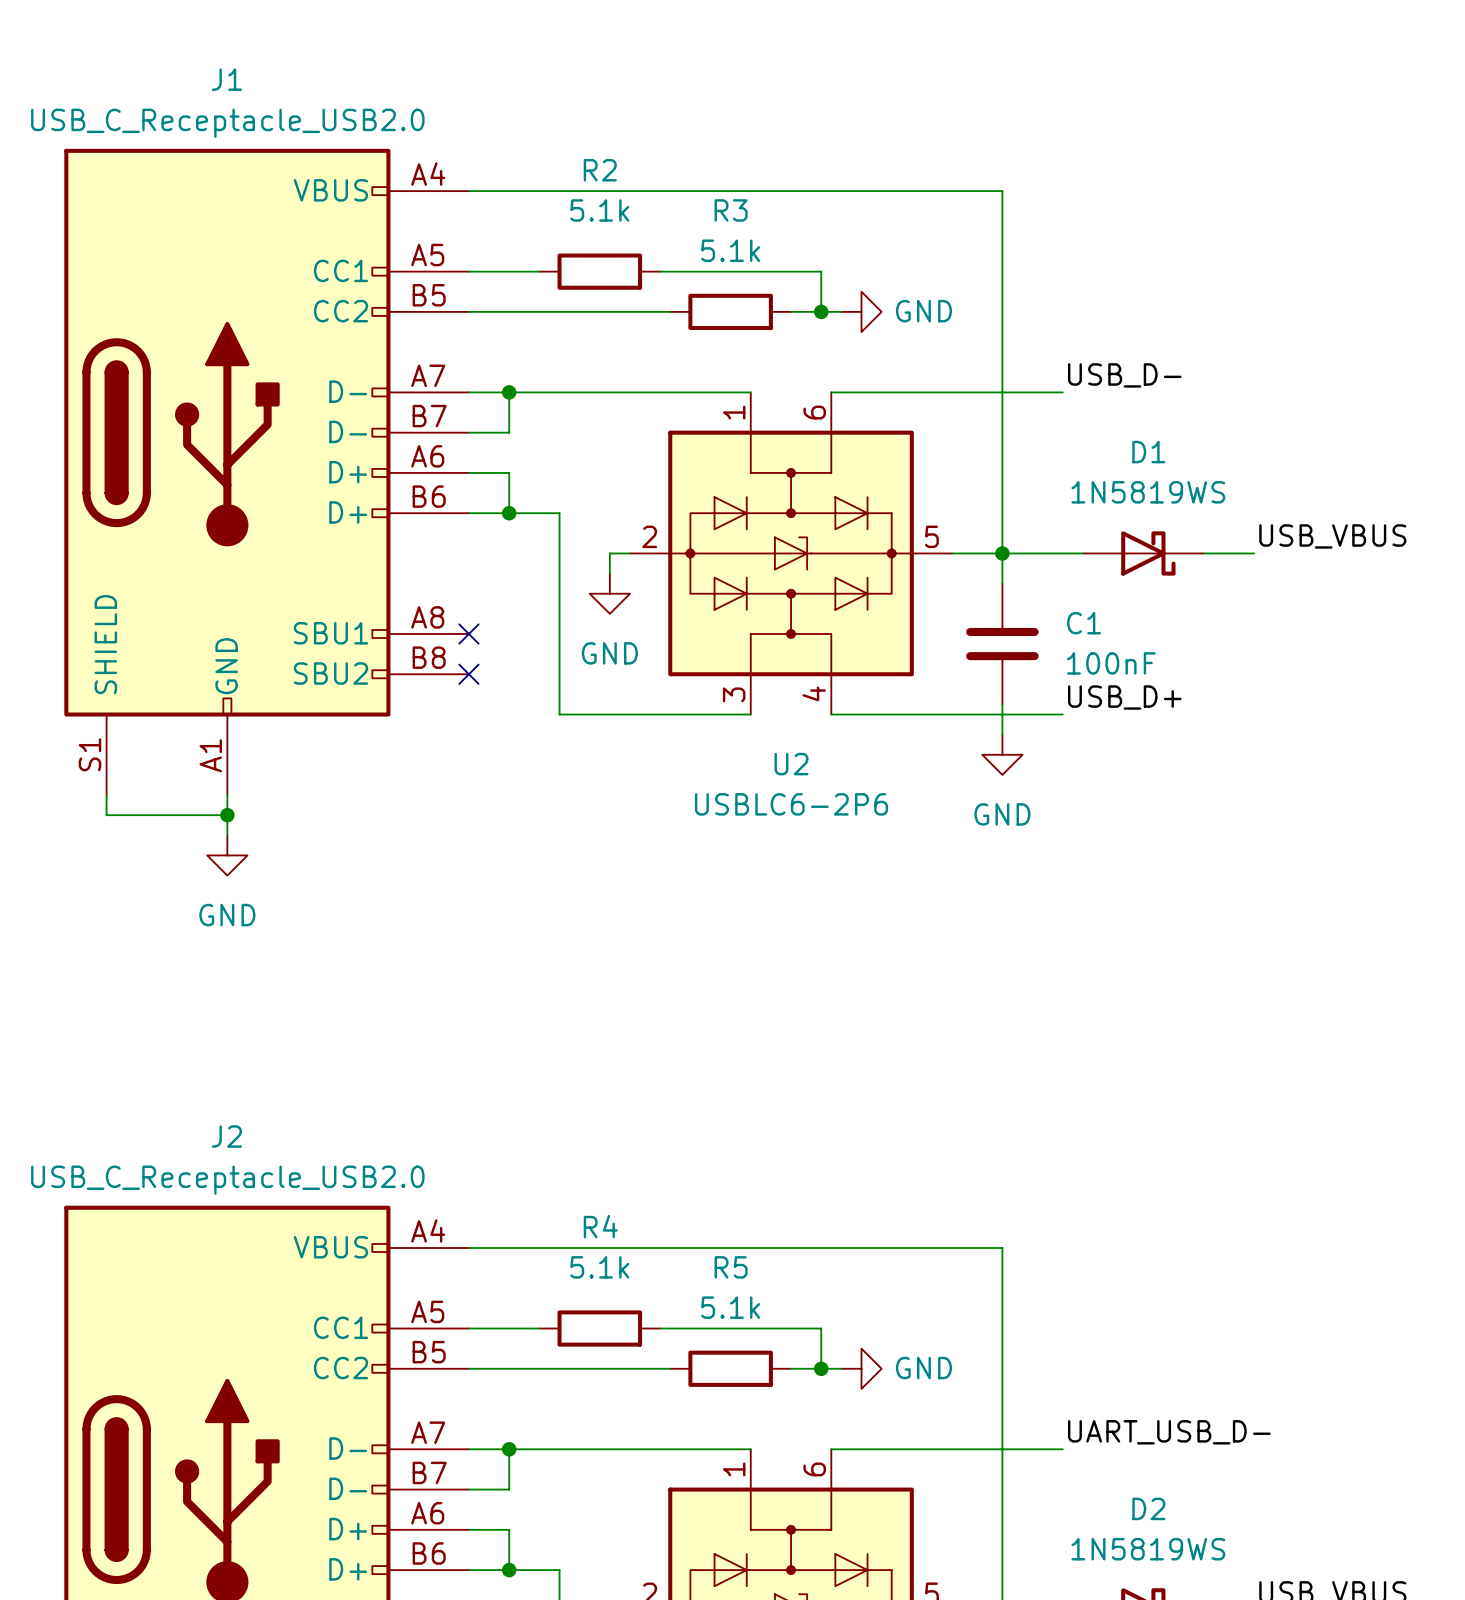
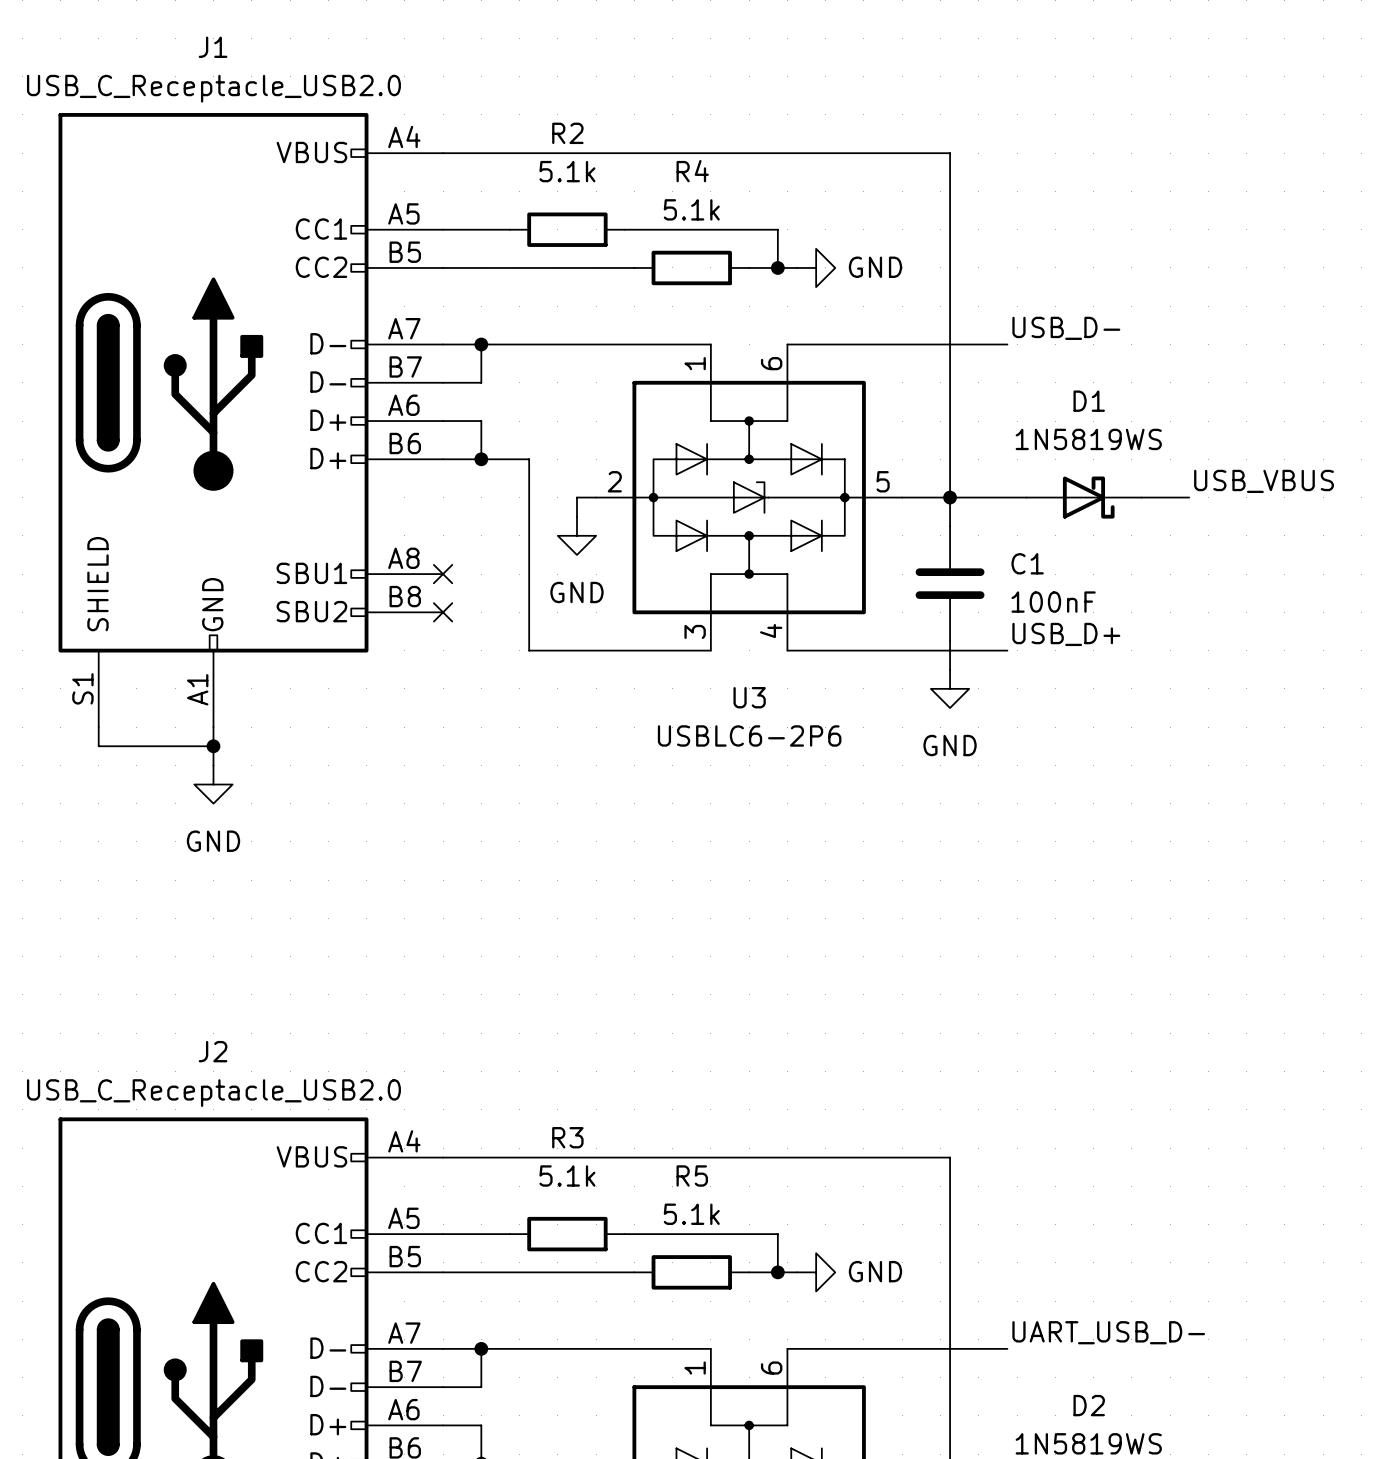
R3 name: R3 (731, 210) -> R4 (692, 171)
U2 name: U2 (791, 764) -> U3 (749, 697)
R4 name: R4 (600, 1226) -> R3 (567, 1137)

